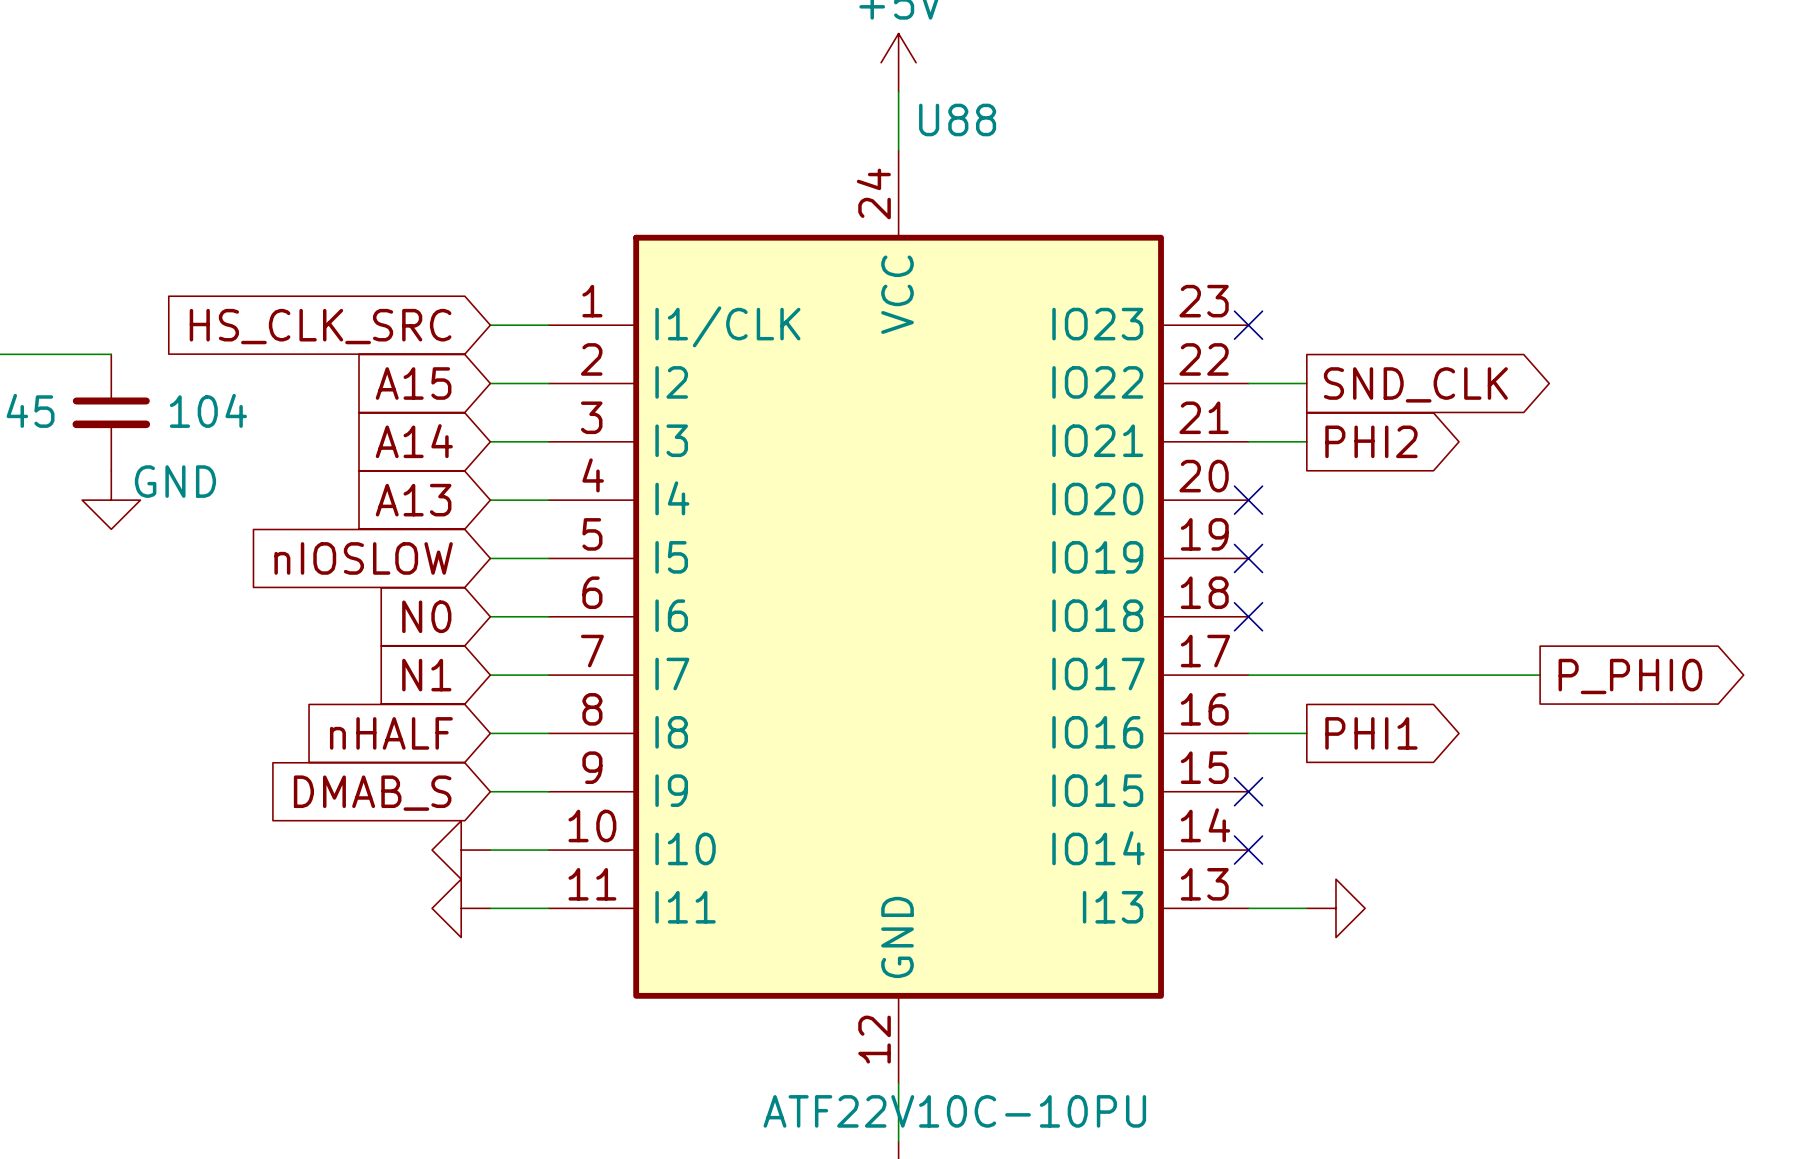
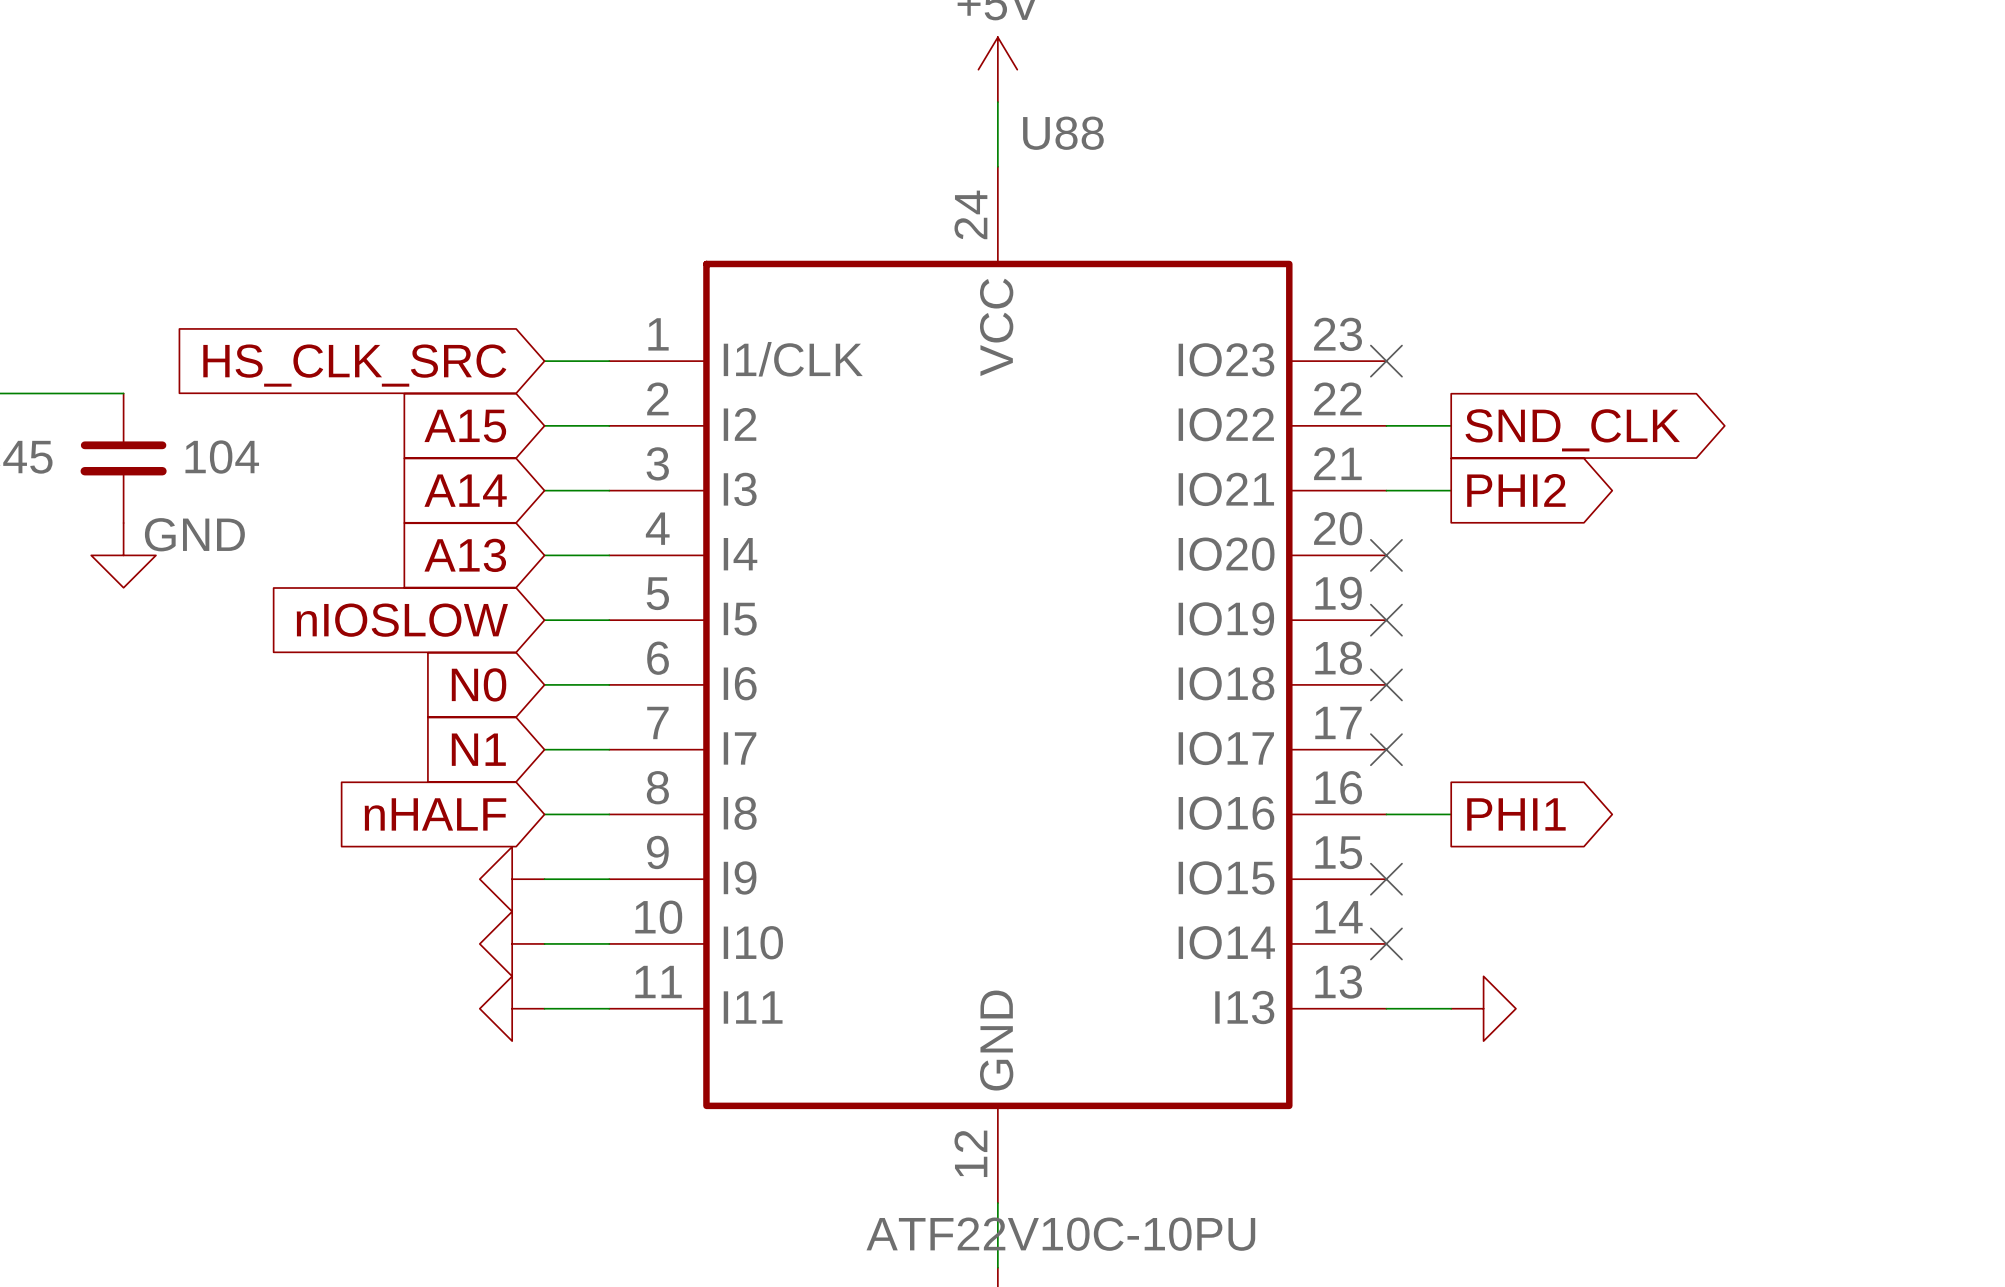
wire: (1248, 675) (1540, 675) -> none
no-connect mark: none -> (1386, 749)
global label: P_PHI0 (1630, 676) -> none
power symbol: none -> (512, 879)
global label: DMAB_S (372, 793) -> none

